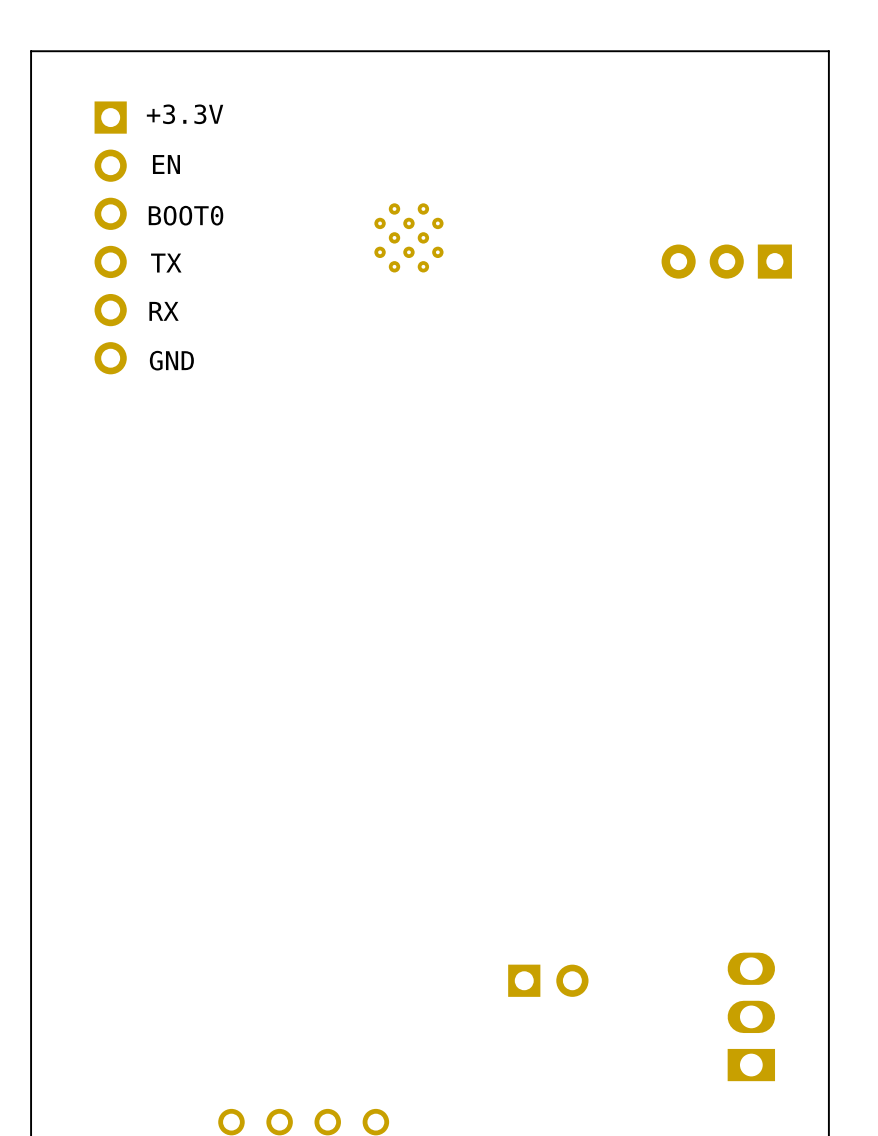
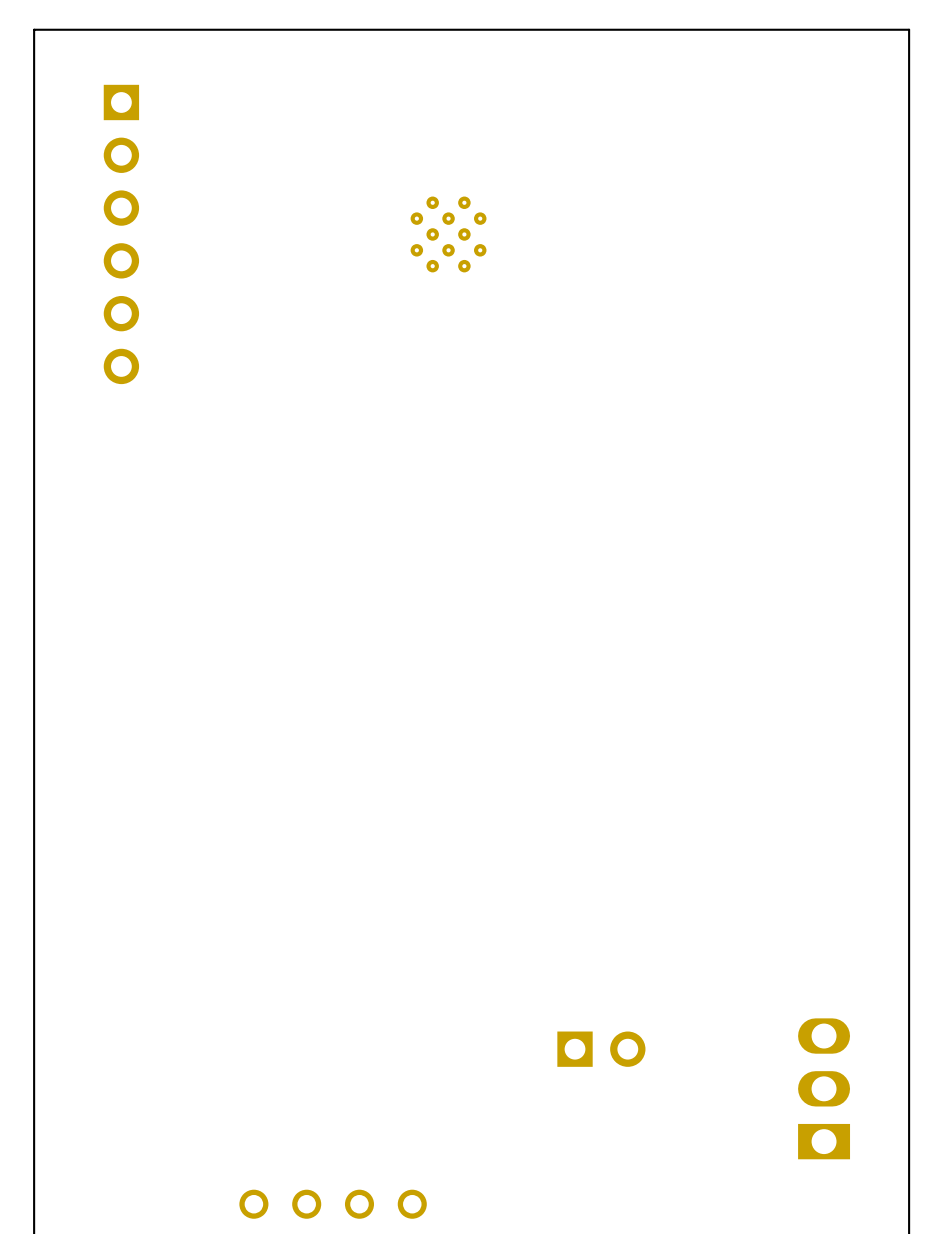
text: +3.3V (185, 114) -> none
text: EN (166, 164) -> none
text: BOOT0 (186, 215) -> none
part: (726, 261) -> none
text: TX (166, 263) -> none
text: RX (164, 311) -> none
text: GND (171, 360) -> none

